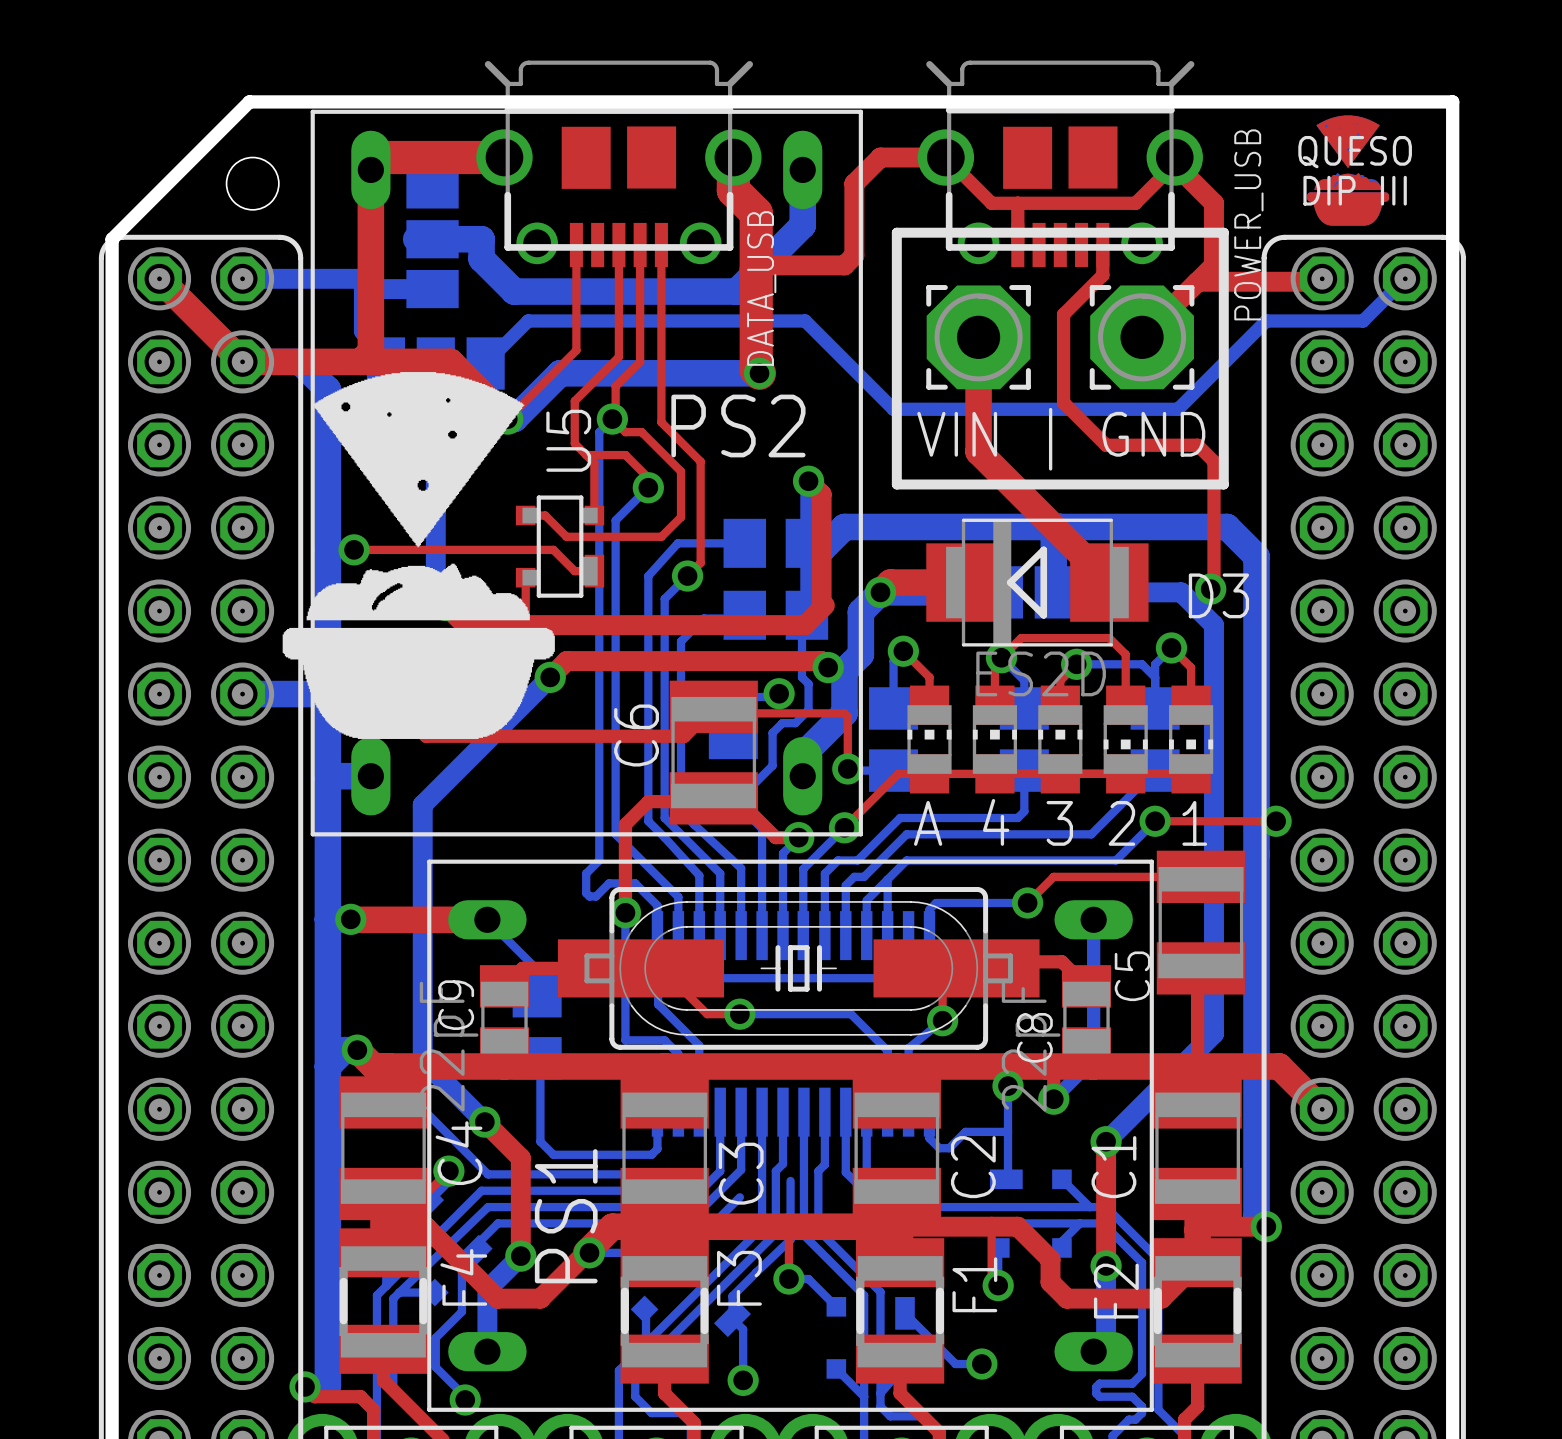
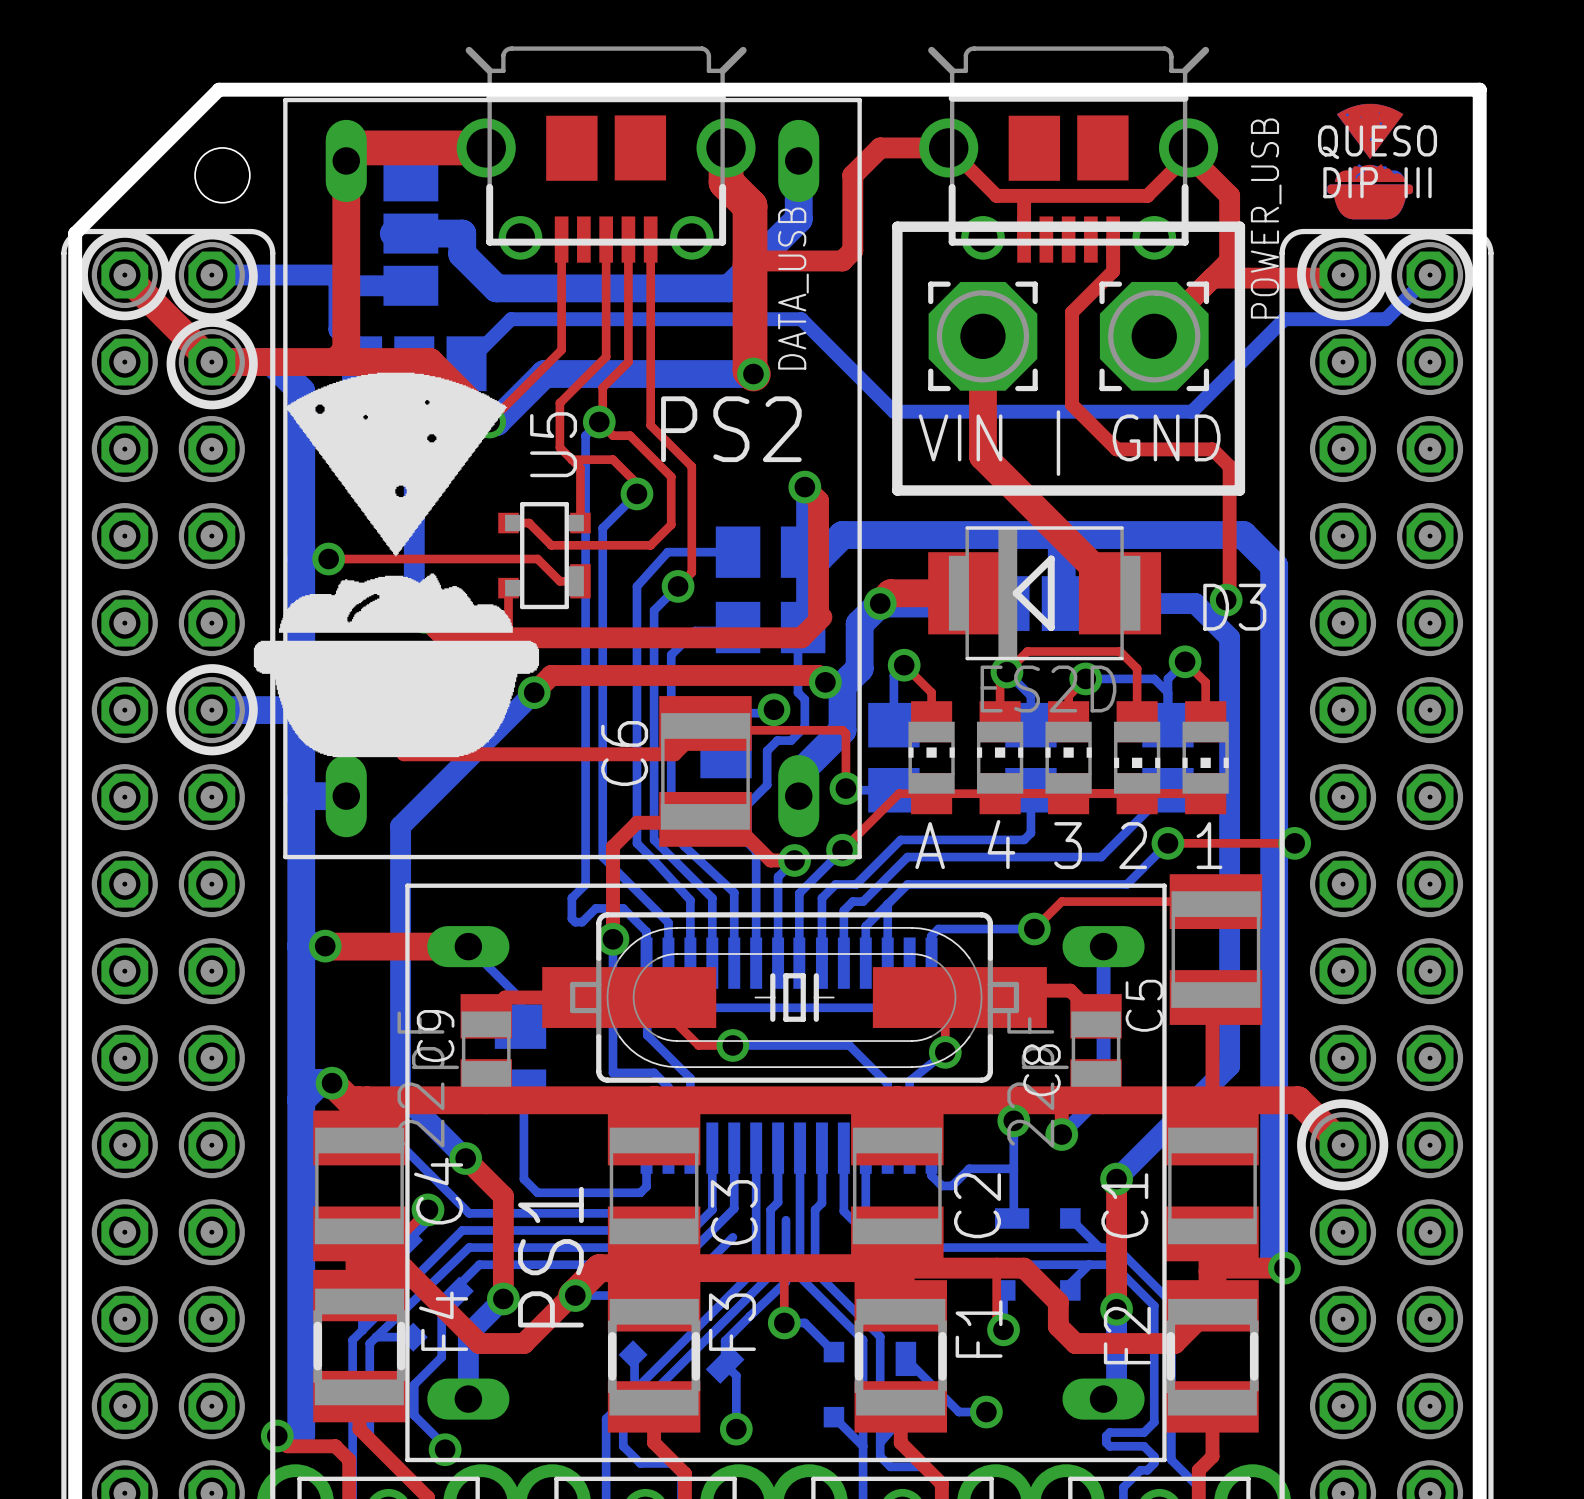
drawing: none -> [79, 229, 258, 410]
drawing: none -> [1297, 229, 1474, 322]
DATA_USB name position: DATA_USB (761, 288) -> DATA_USB (793, 288)
drawing: none -> [166, 664, 258, 756]
drawing: none -> [1297, 1099, 1389, 1191]

